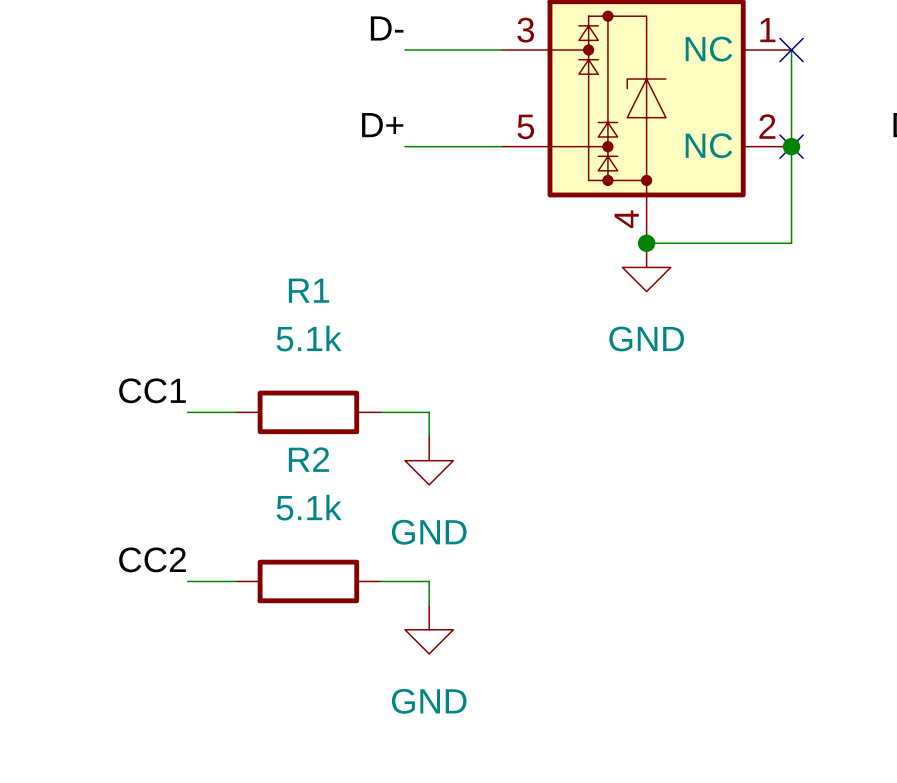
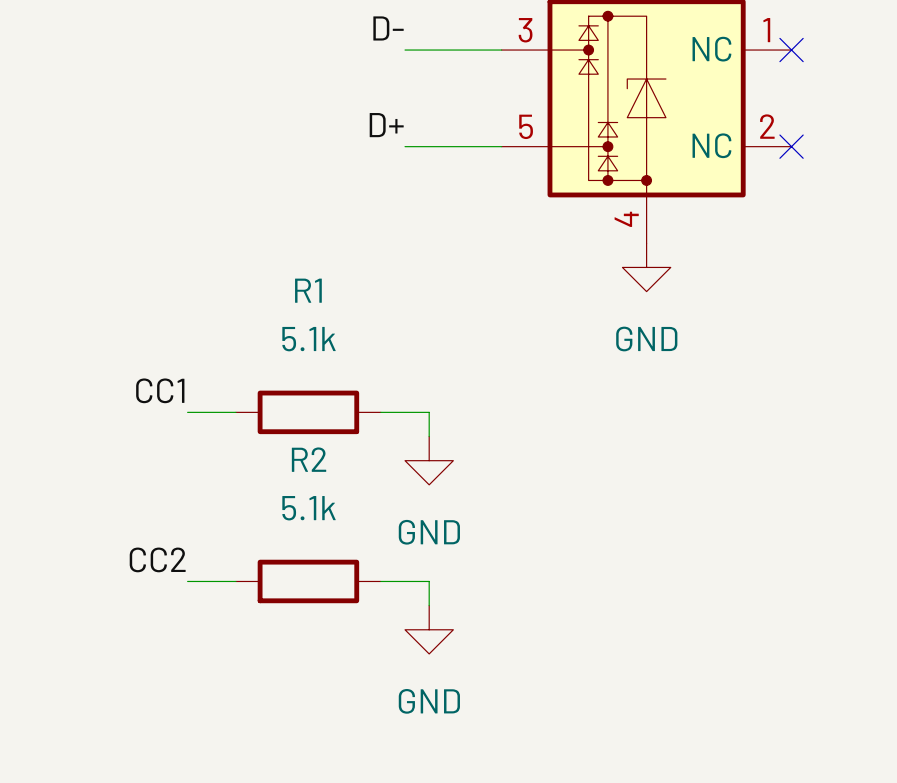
wire: (791, 50) (791, 243) (646, 243) -> none
junction: (791, 146) -> none
junction: (646, 243) -> none

